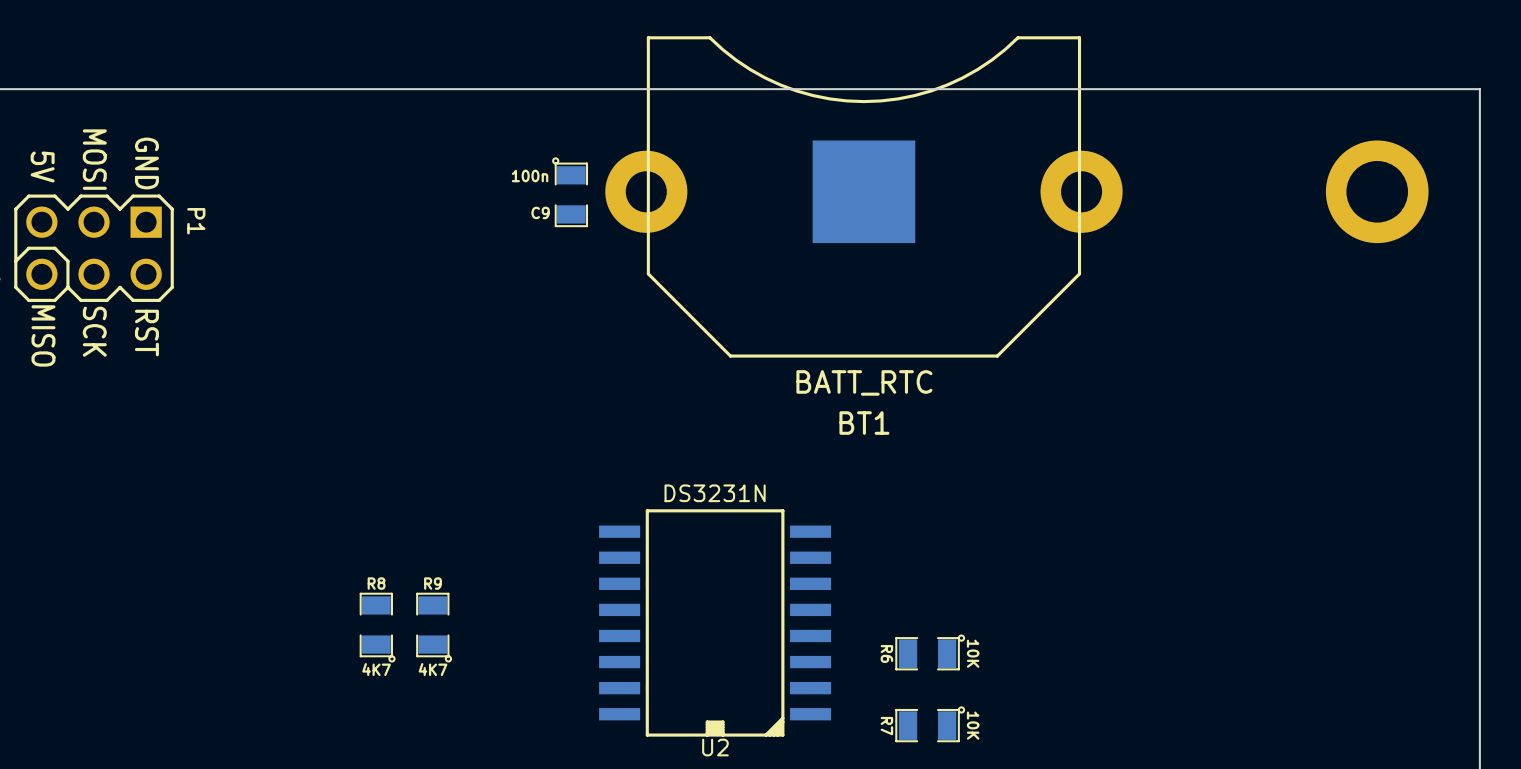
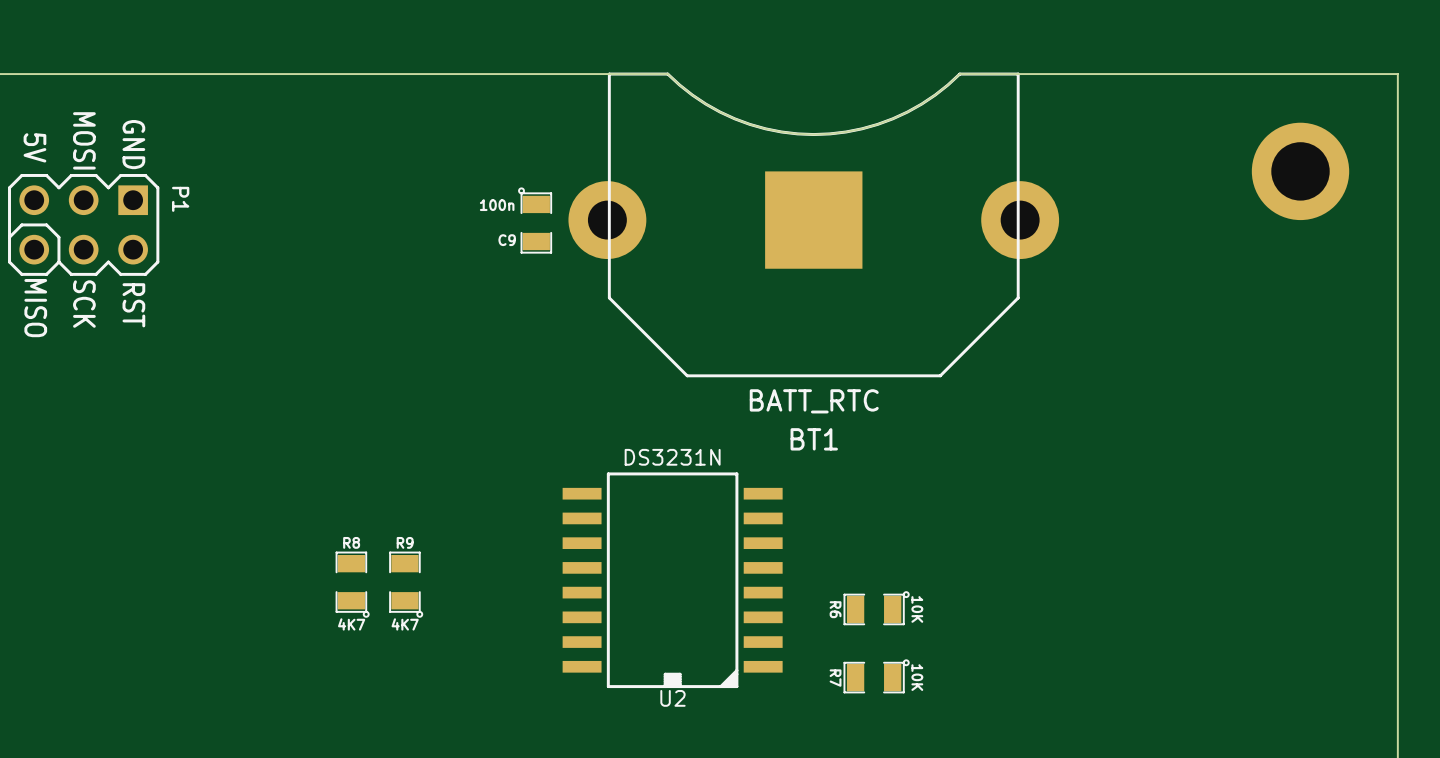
board edge: (1017, 89) (709, 89) -> (959, 74) (921, 104) (892, 118) (861, 128) (813, 134) (765, 128) (734, 118) (692, 95) (667, 74)
C9 position: (570, 192) -> (535, 220)
BT1 position: (863, 196) -> (813, 224)

